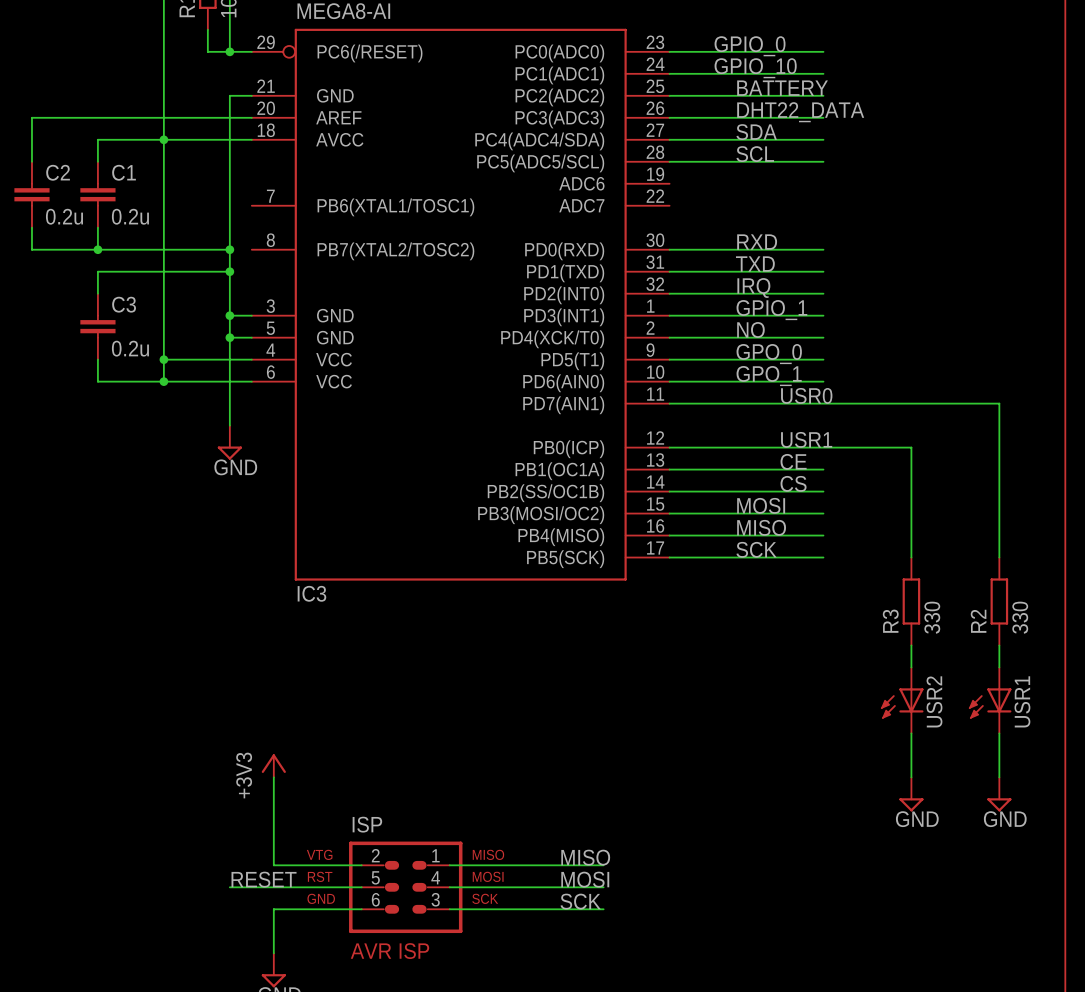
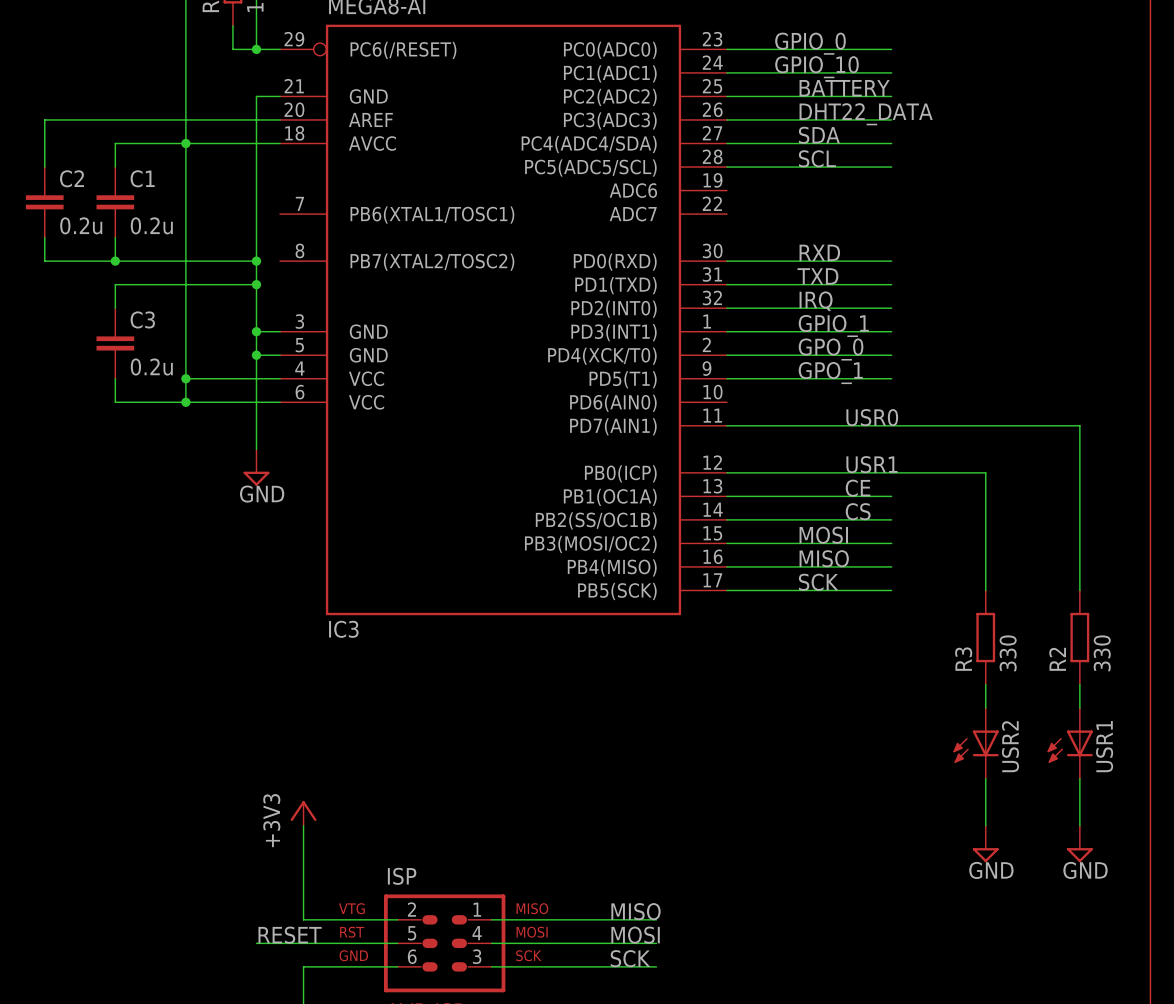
label: NO (750, 329) -> GPO_0 (831, 349)
label: GPO_0 (769, 354) -> GPO_1 (830, 373)
label: GPO_1 (769, 376) -> none
wire: (669, 381) (823, 381) -> none

